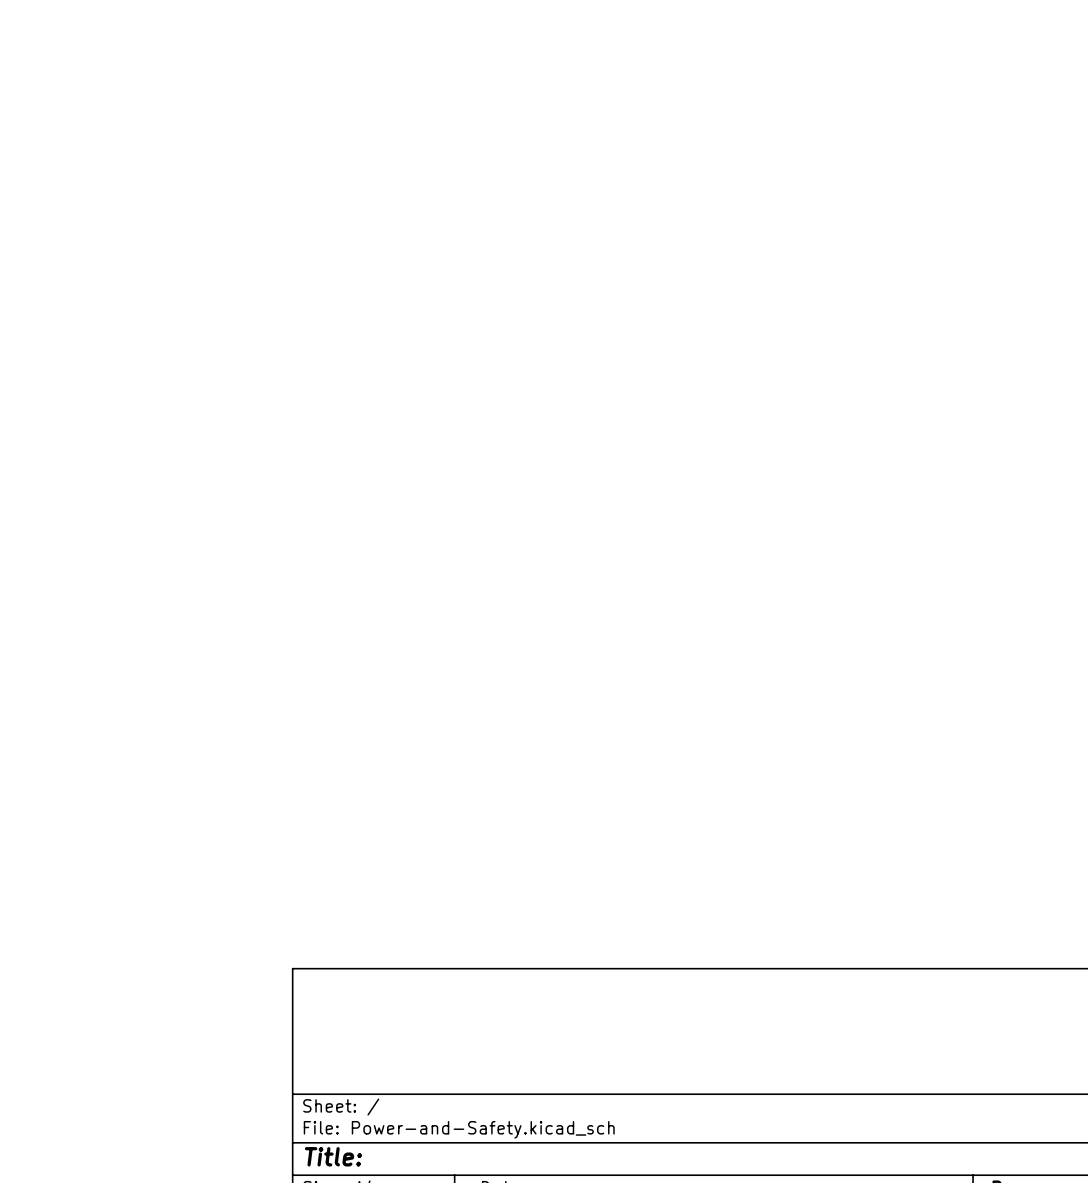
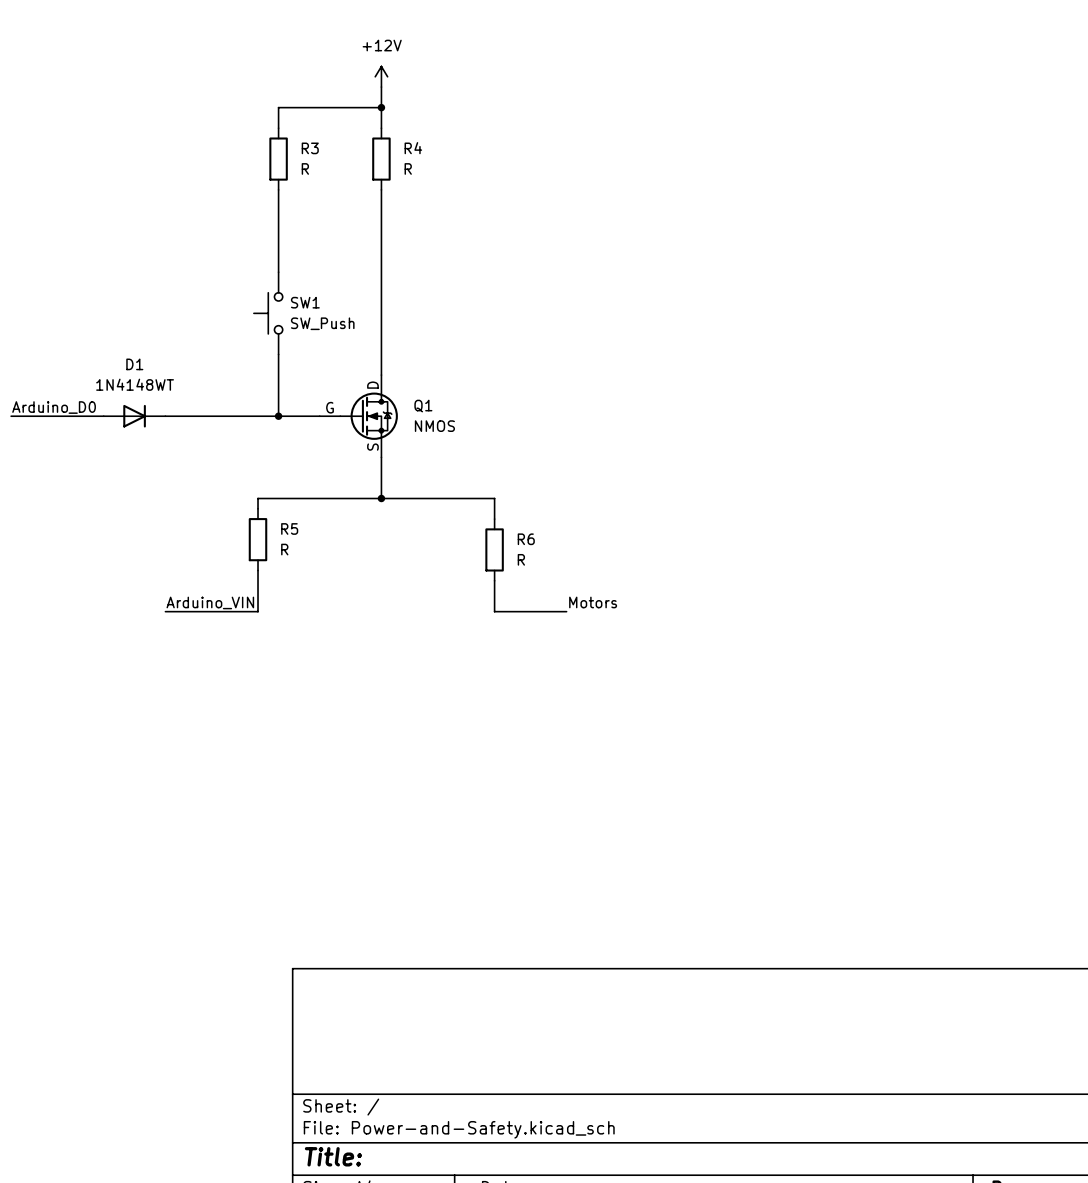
power symbol: none -> +12V (381, 76)
wire: none -> (381, 87) (381, 128)
wire: none -> (381, 107) (278, 107) (278, 128)
junction: none -> (381, 107)
R3: none -> R (278, 159)
R4: none -> R (381, 159)
wire: none -> (278, 189) (278, 272)
wire: none -> (381, 189) (381, 375)
SW1: none -> SW_Push (268, 313)
wire: none -> (278, 354) (278, 416)
label: none -> Arduino_D0 (54, 407)
wire: none -> (11, 416) (103, 416)
D1: none -> 1N4148WT (134, 416)
wire: none -> (165, 416) (319, 416)
junction: none -> (278, 416)
Q1: none -> NMOS (358, 416)
wire: none -> (381, 457) (381, 498)
junction: none -> (381, 498)
wire: none -> (258, 508) (258, 498) (494, 498) (494, 519)
R5: none -> R (258, 539)
R6: none -> R (494, 549)
wire: none -> (258, 570) (258, 611) (165, 611)
wire: none -> (494, 580) (494, 611) (566, 611)
label: none -> Arduino_VIN (210, 602)
label: none -> Motors (593, 602)

